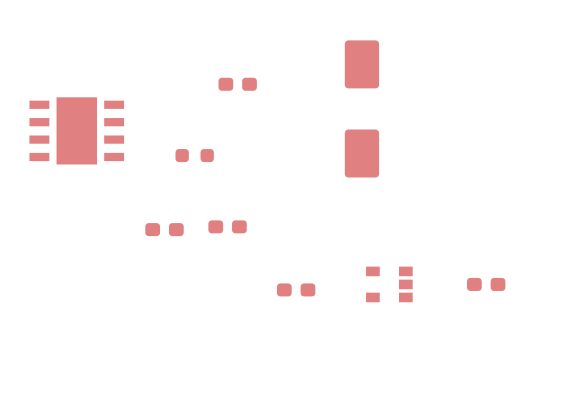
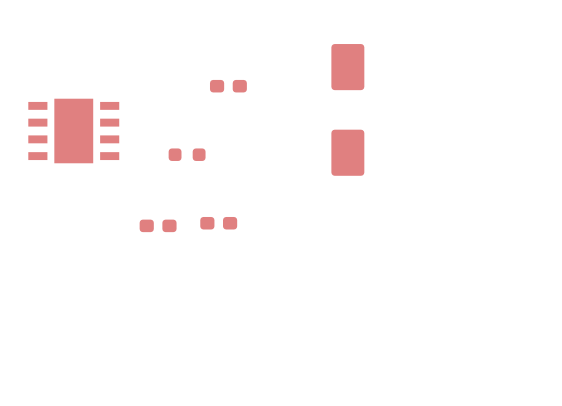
part: (389, 284) -> none
part: (486, 284) -> none
part: (296, 289) -> none

